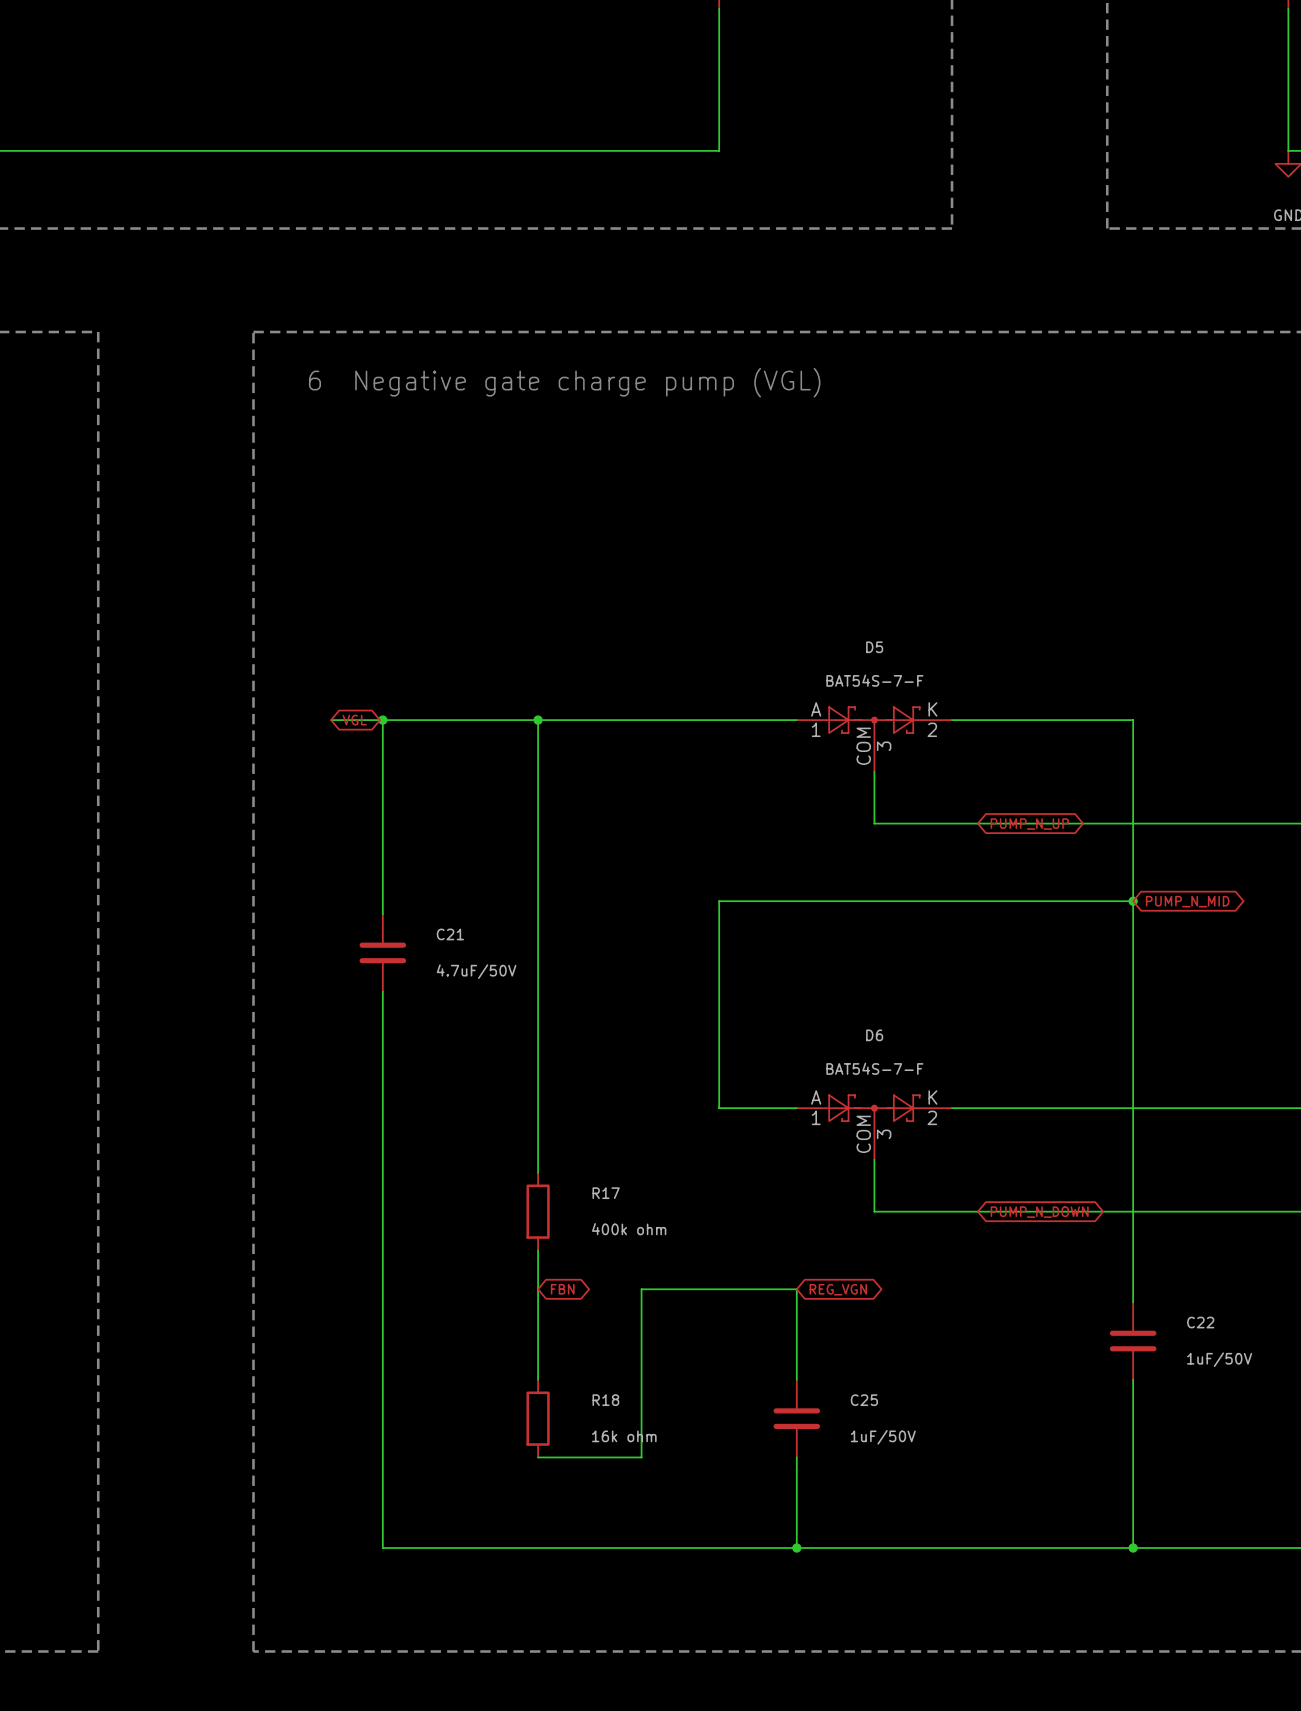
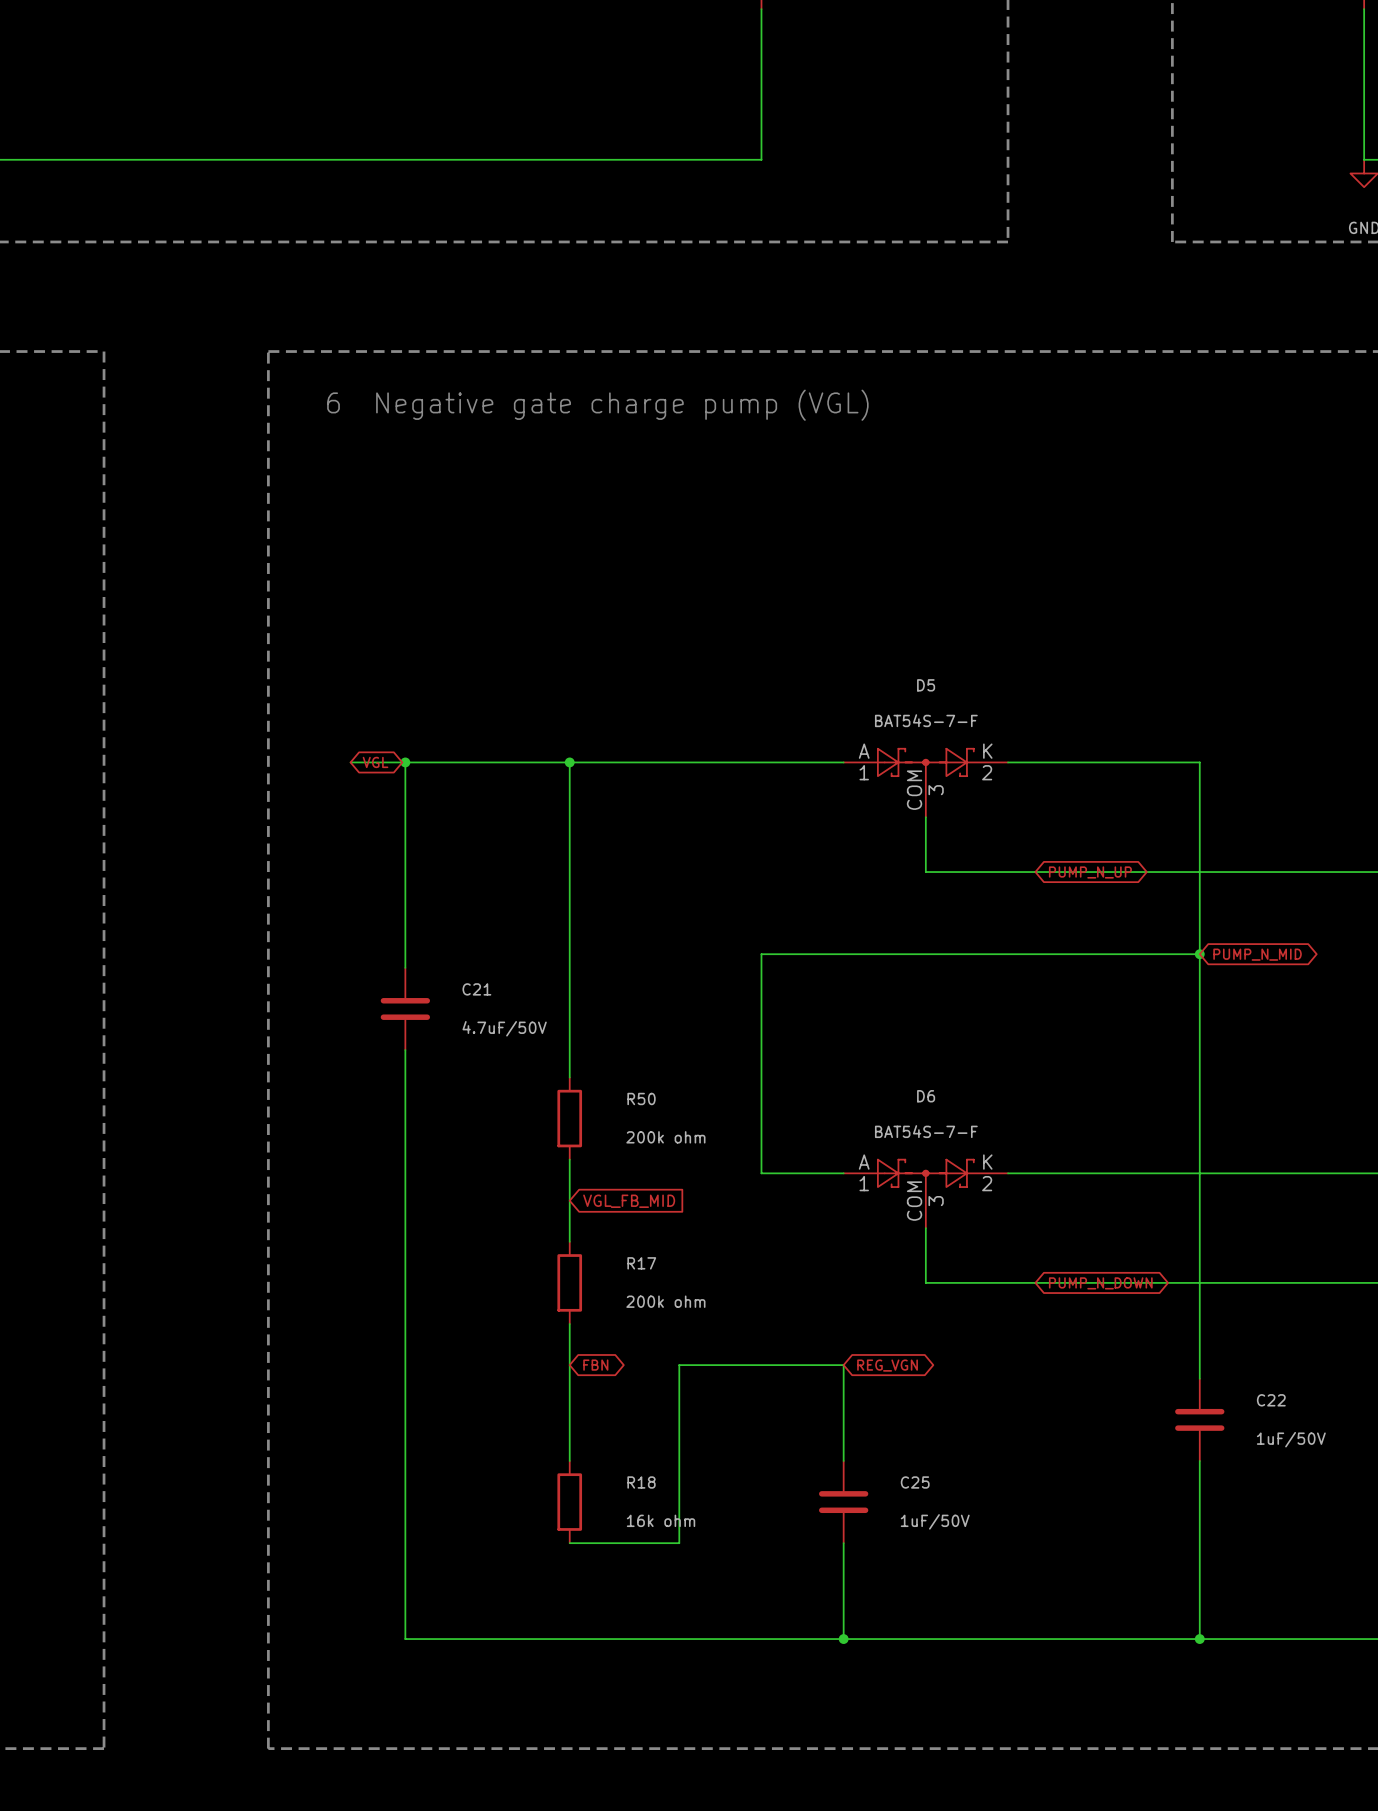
wire: (538, 1017) (538, 1095) -> none
R50: none -> 200k ohm (569, 1118)
global label: none -> VGL_FB_MID (629, 1201)
R17 value: 400k ohm (629, 1229) -> 200k ohm (665, 1301)

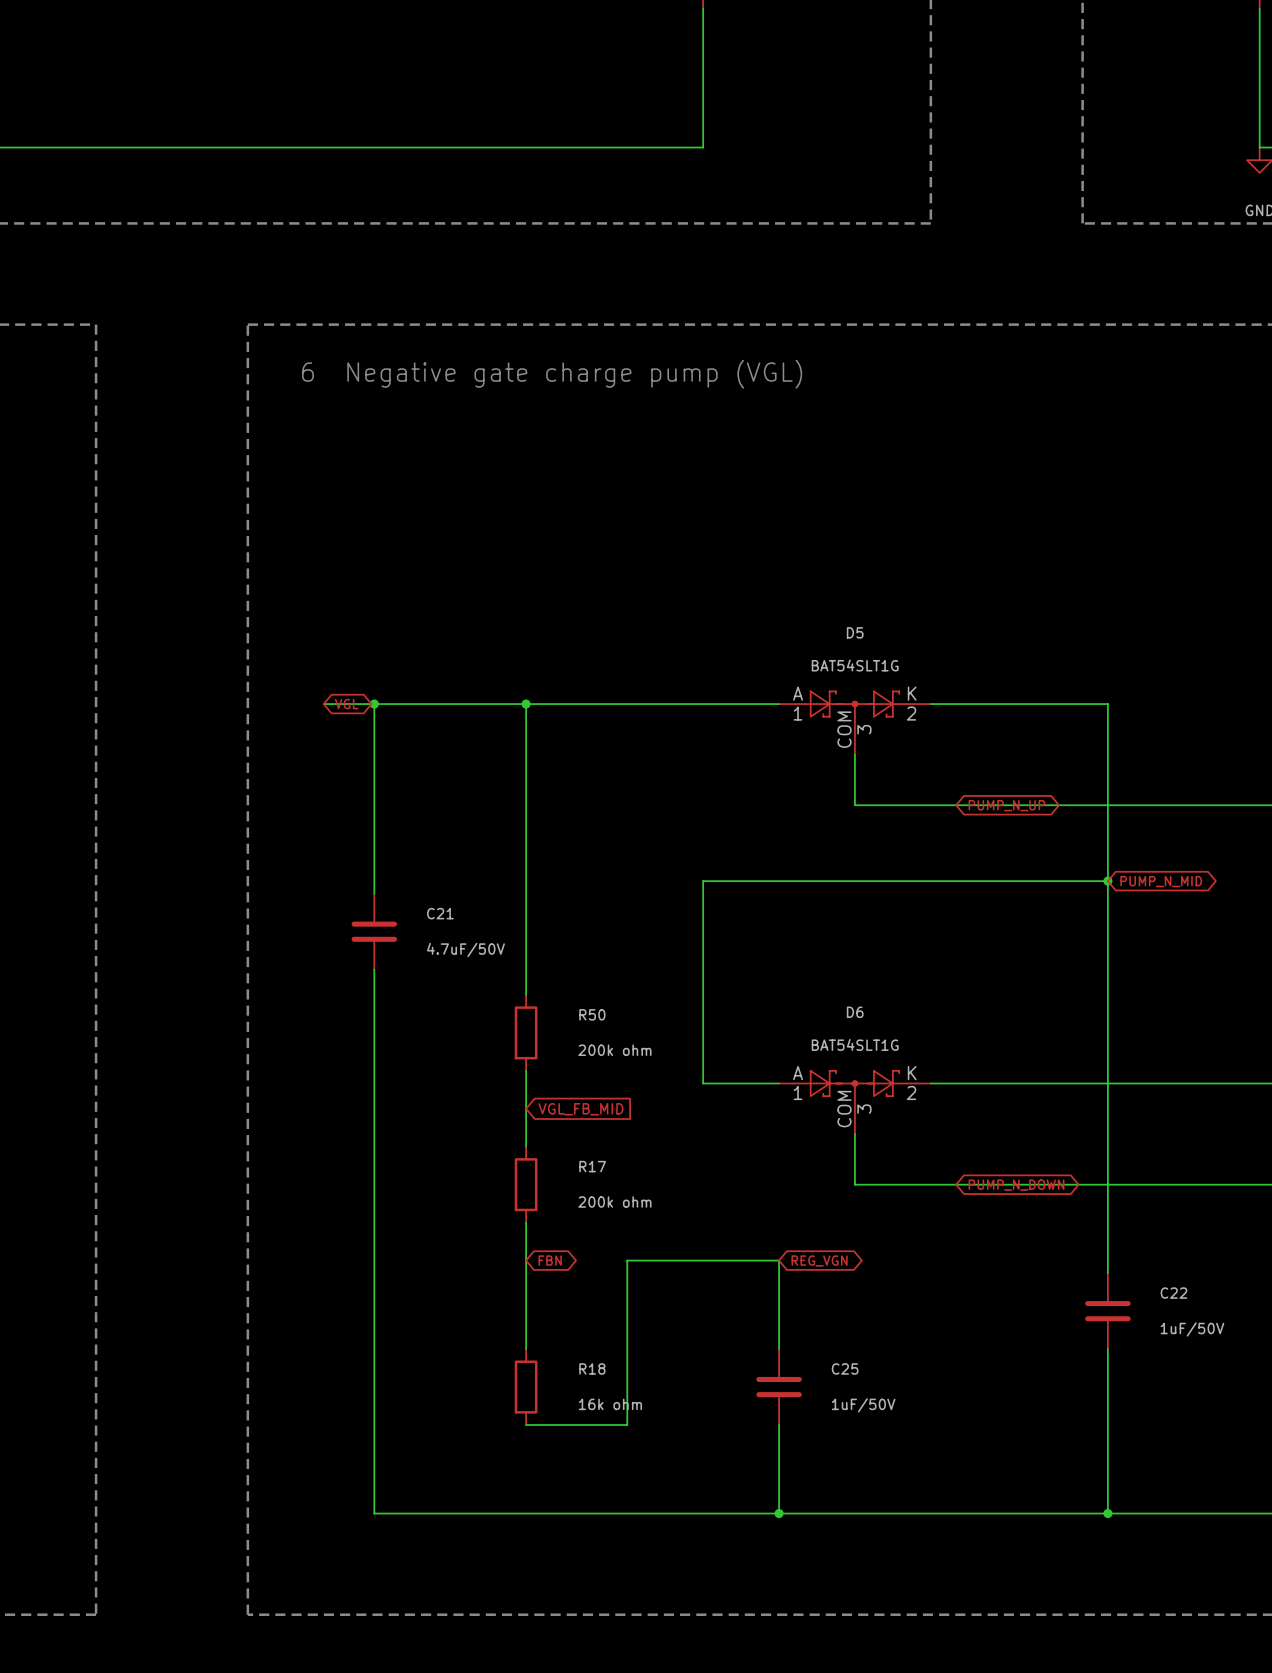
D5 value: BAT54S-7-F (926, 720) -> BAT54SLT1G (855, 665)
D6 value: BAT54S-7-F (926, 1131) -> BAT54SLT1G (855, 1044)

